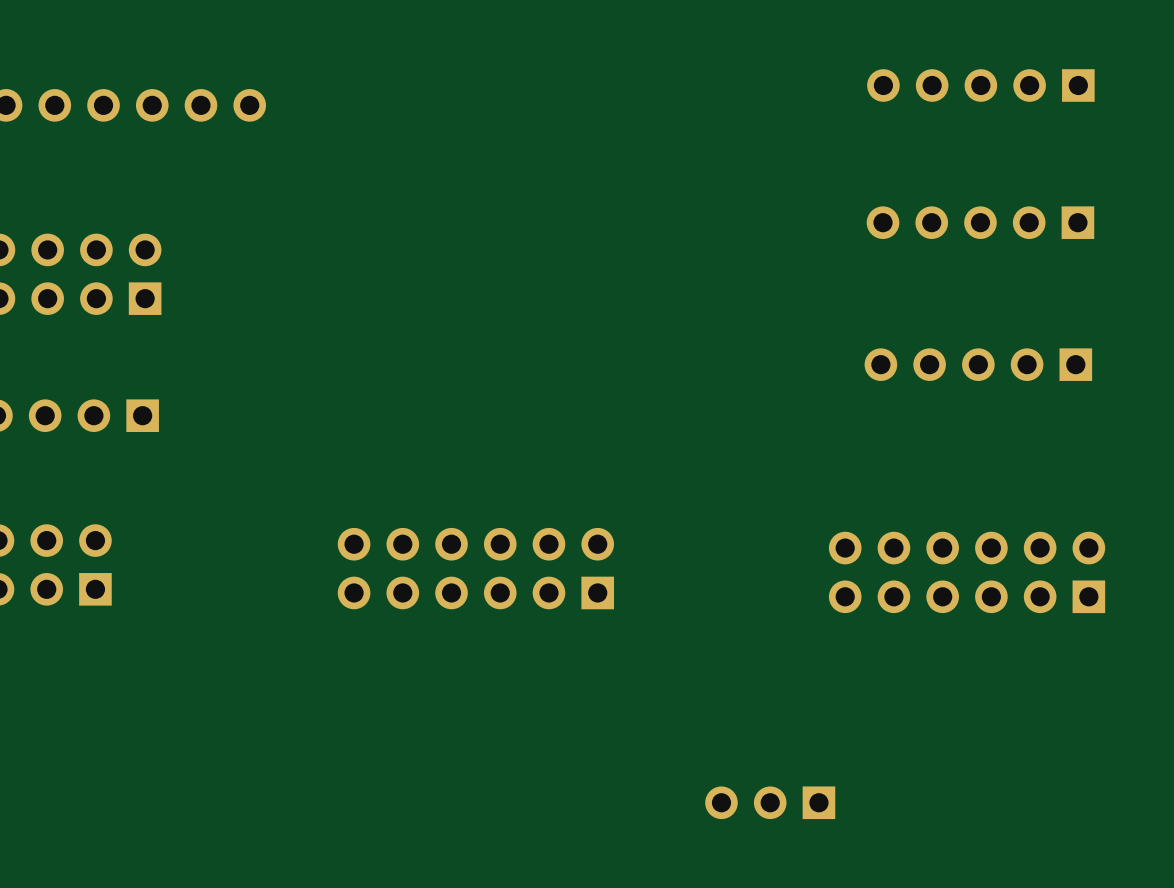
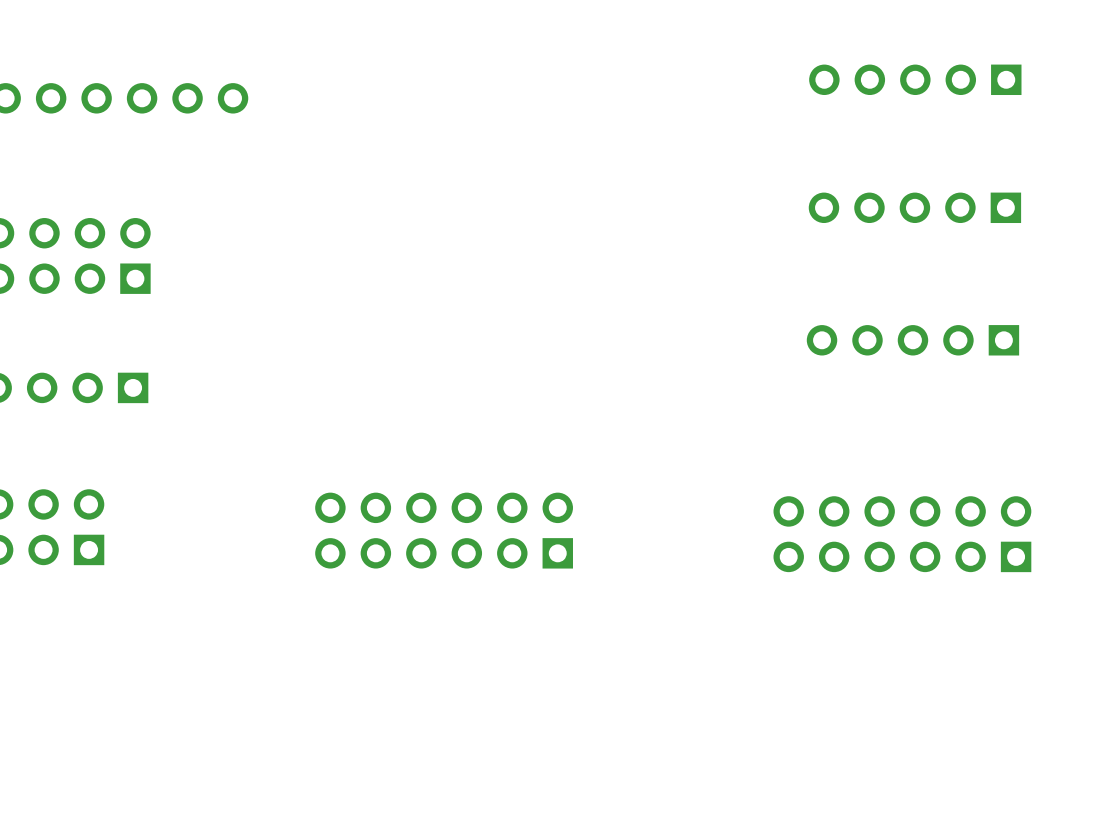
part: (770, 802) -> none

